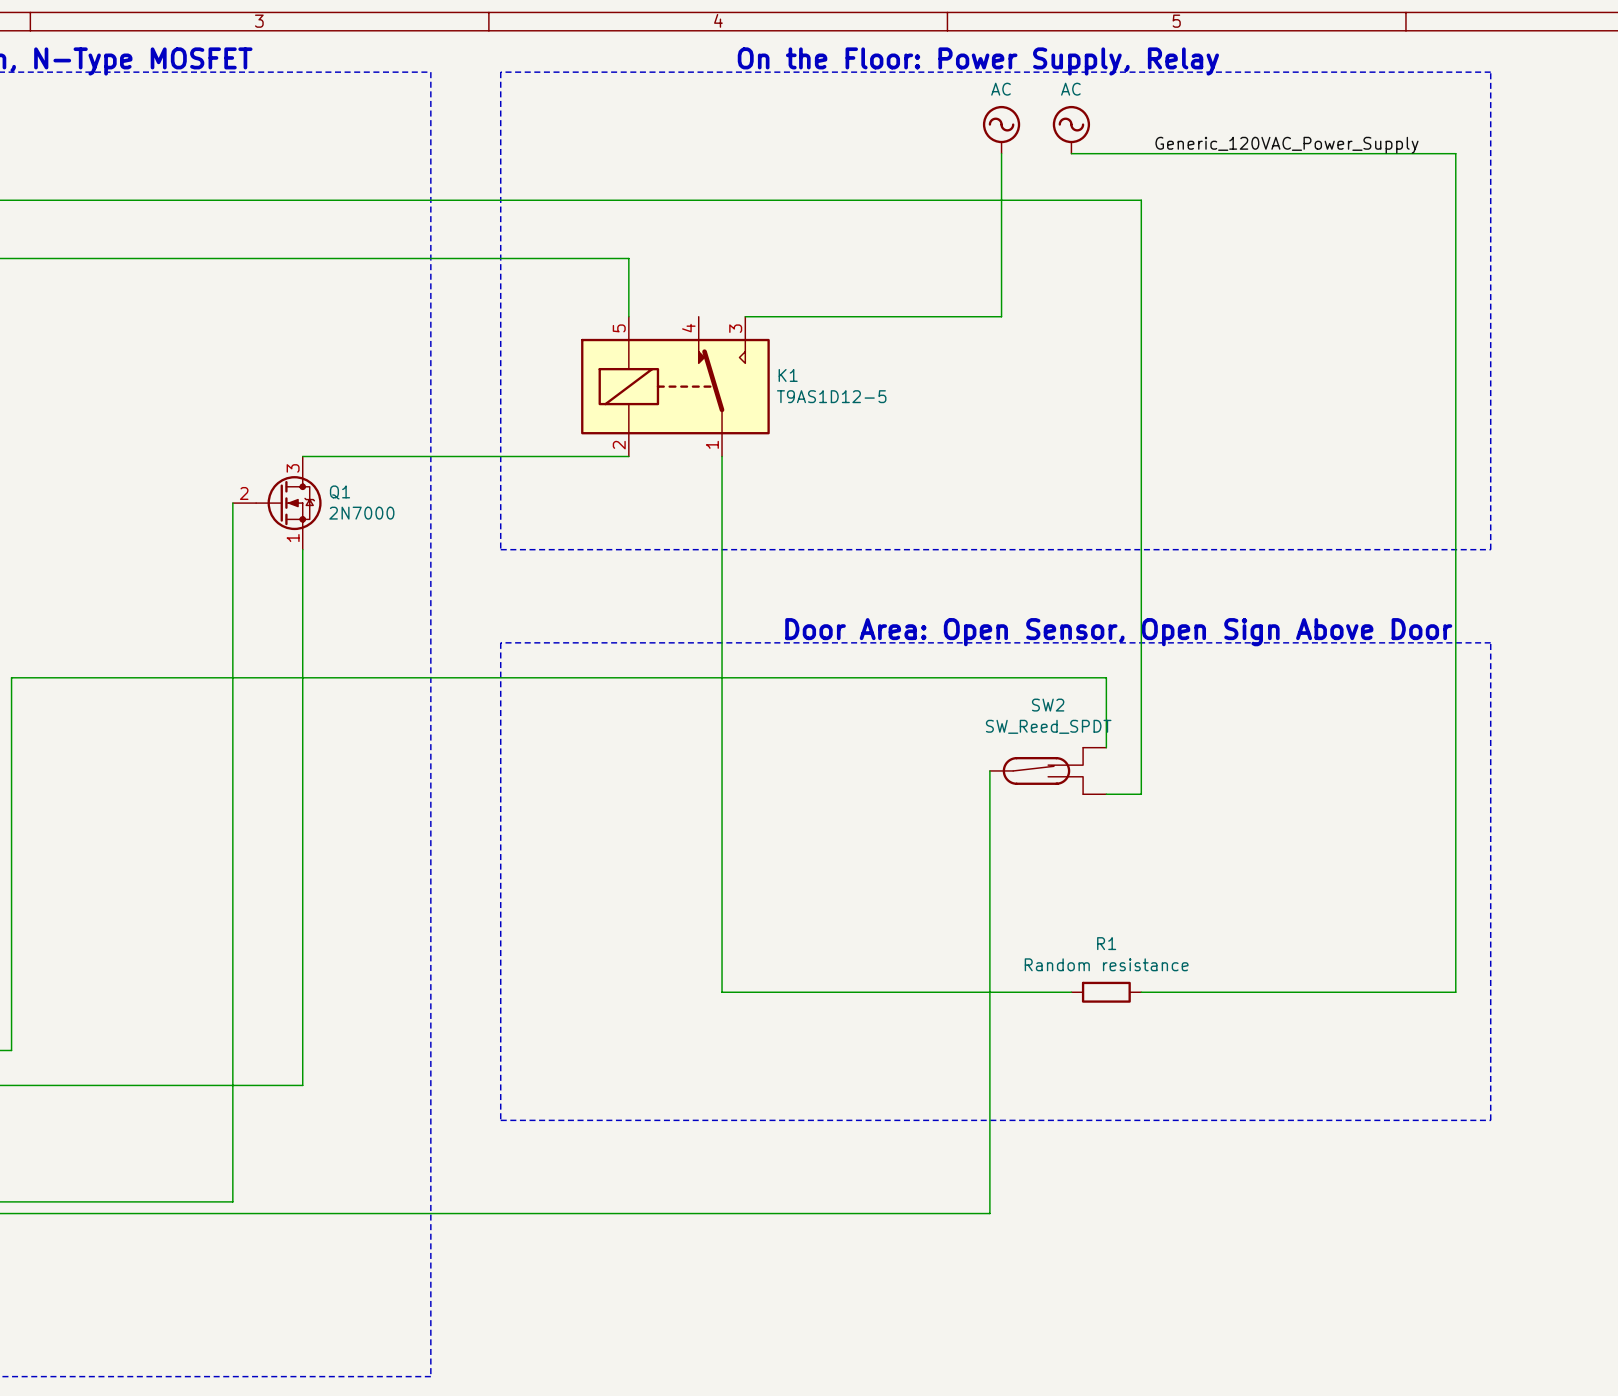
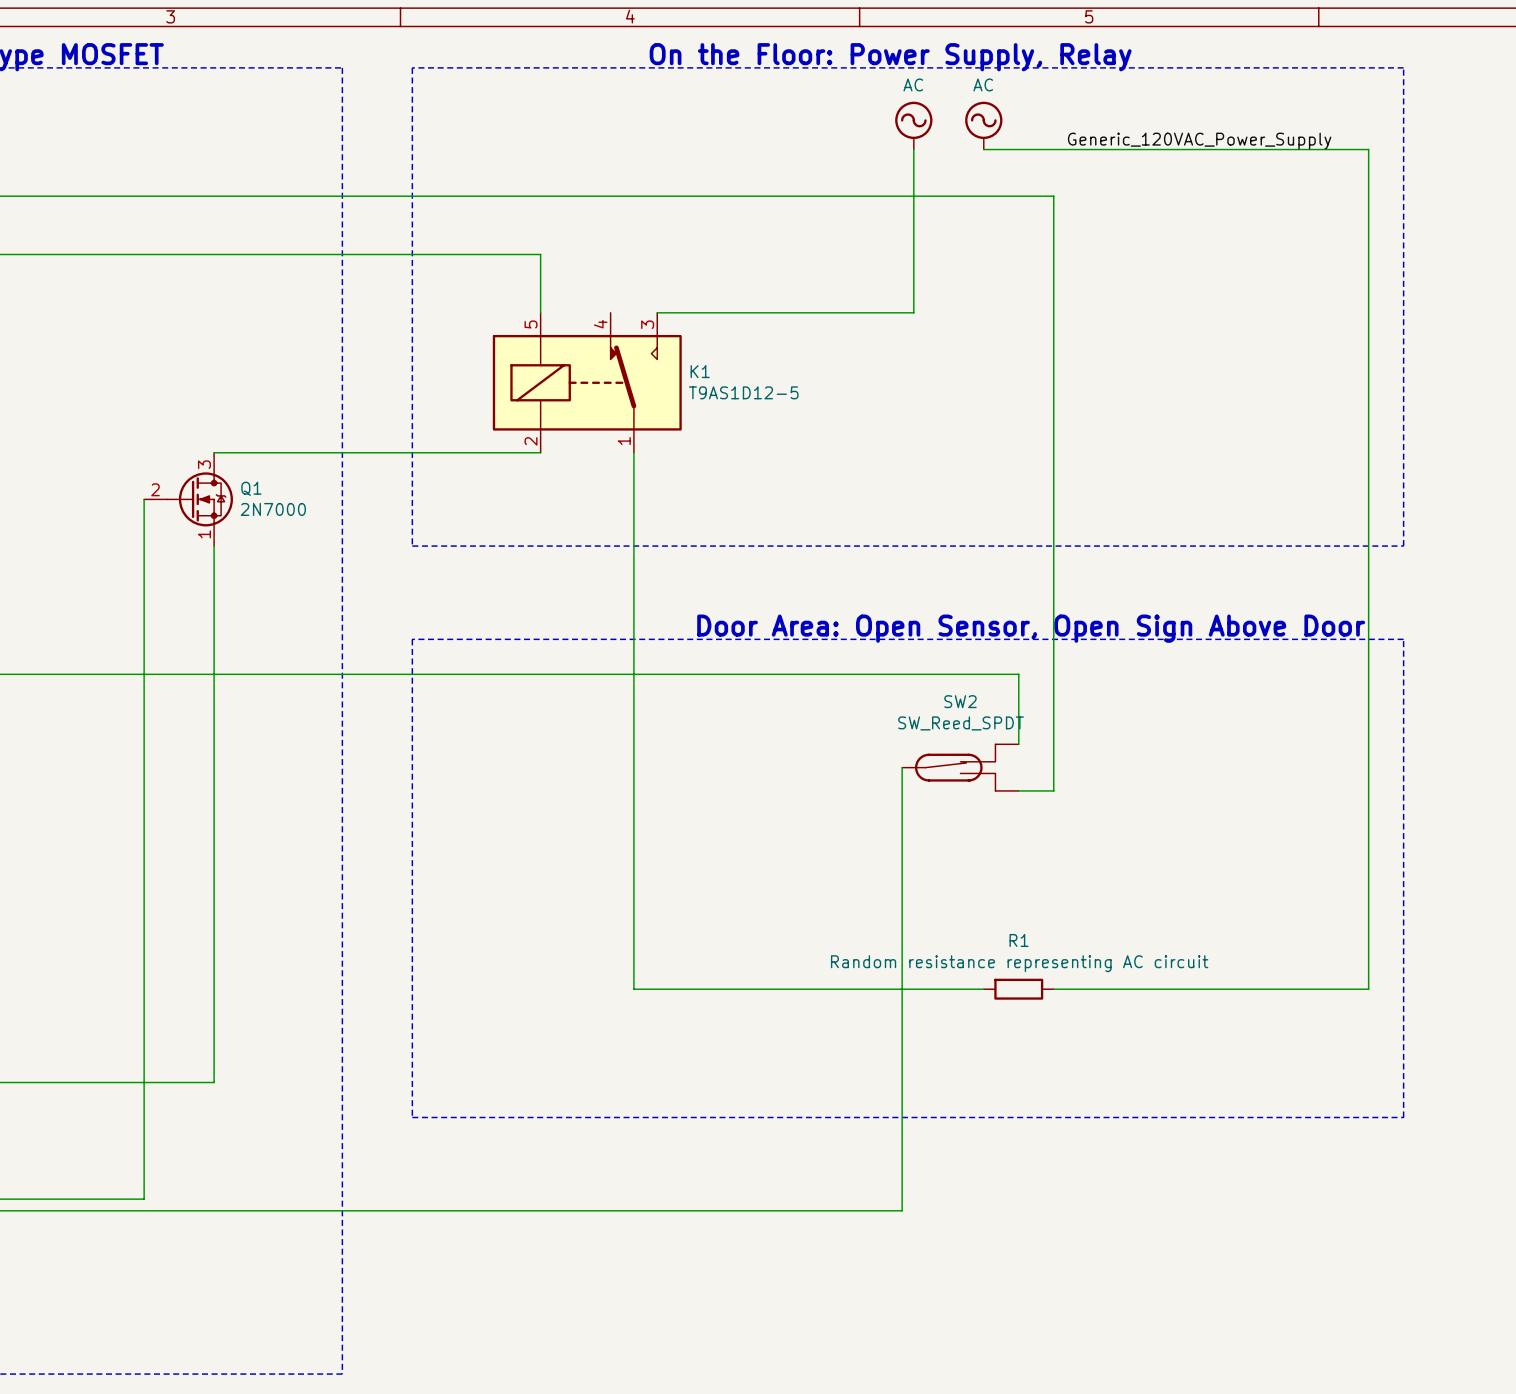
R1 value: Random resistance (1106, 964) -> Random resistance representing AC circuit (1019, 963)

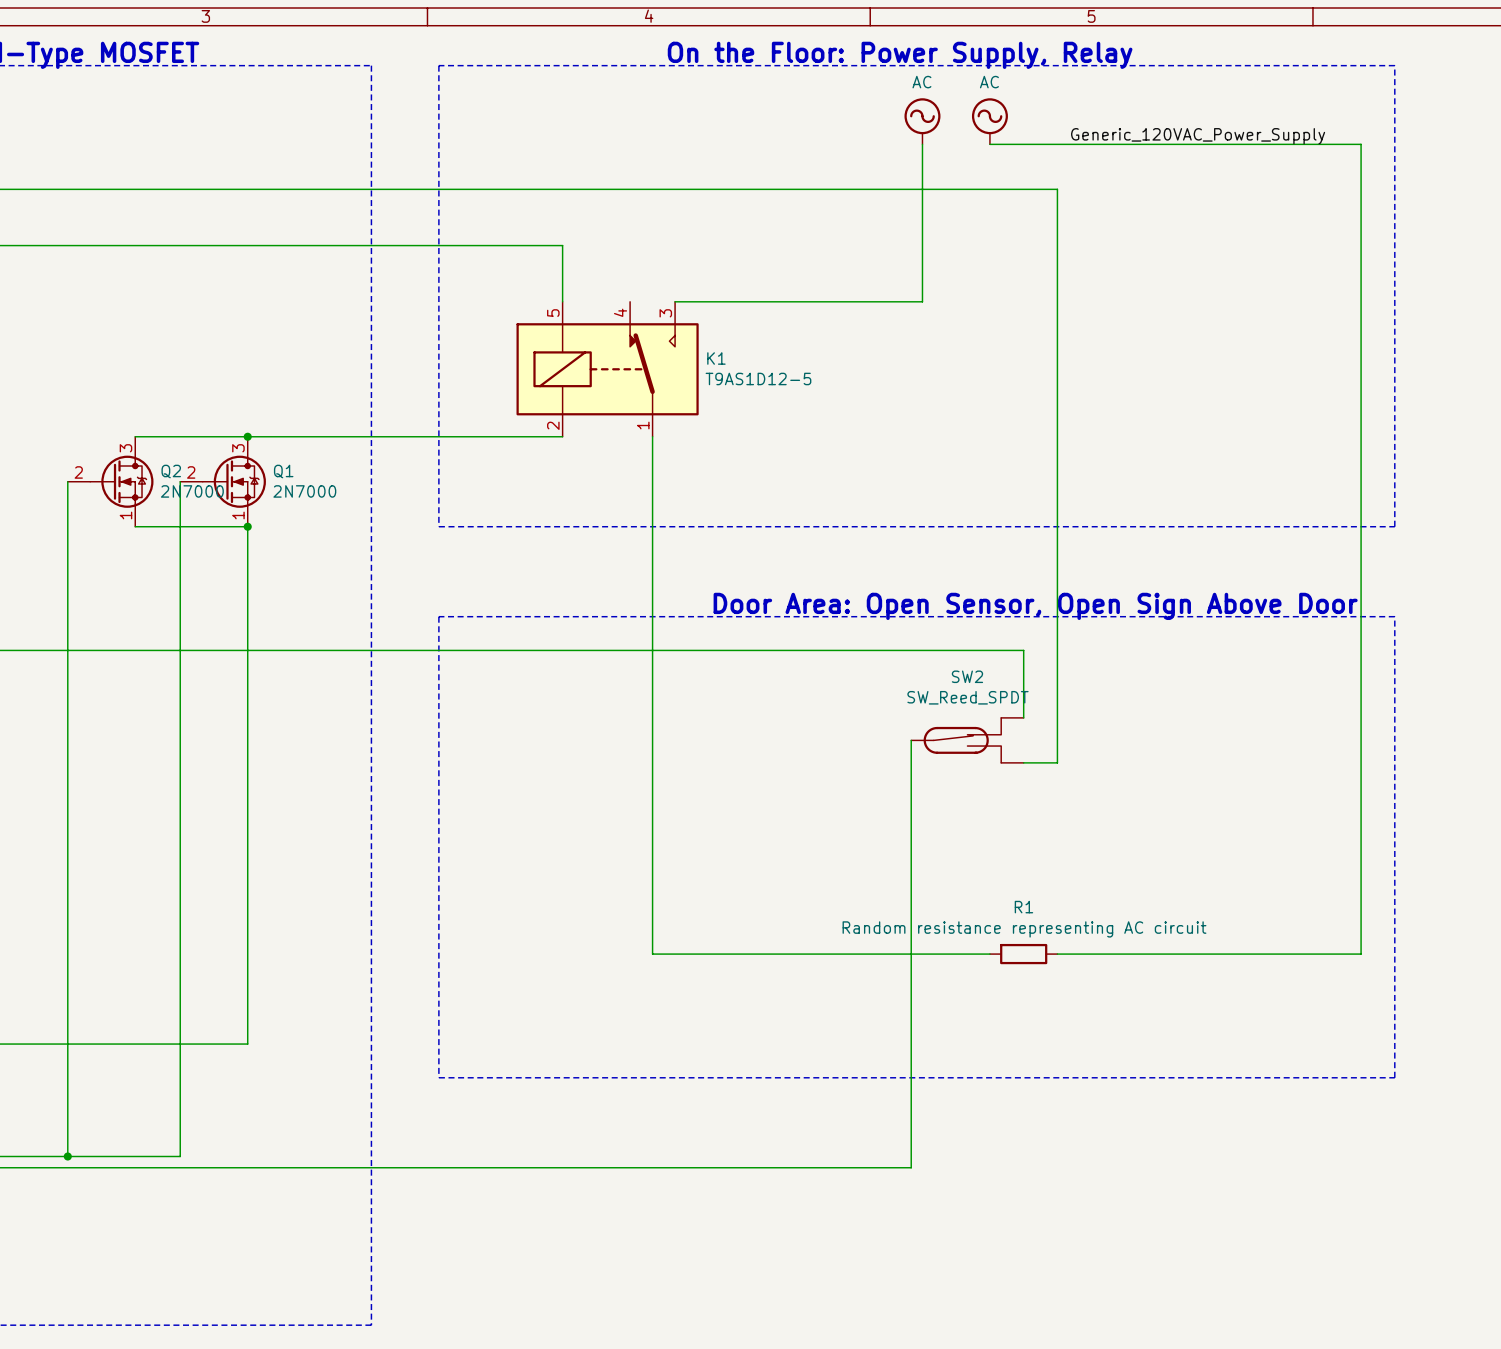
wire: none -> (135, 436) (247, 436)
junction: none -> (247, 436)
wire: none -> (67, 481) (67, 1156)
Q2: none -> 2N7000 (110, 481)
wire: none -> (135, 526) (247, 526)
junction: none -> (247, 526)
junction: none -> (67, 1156)

